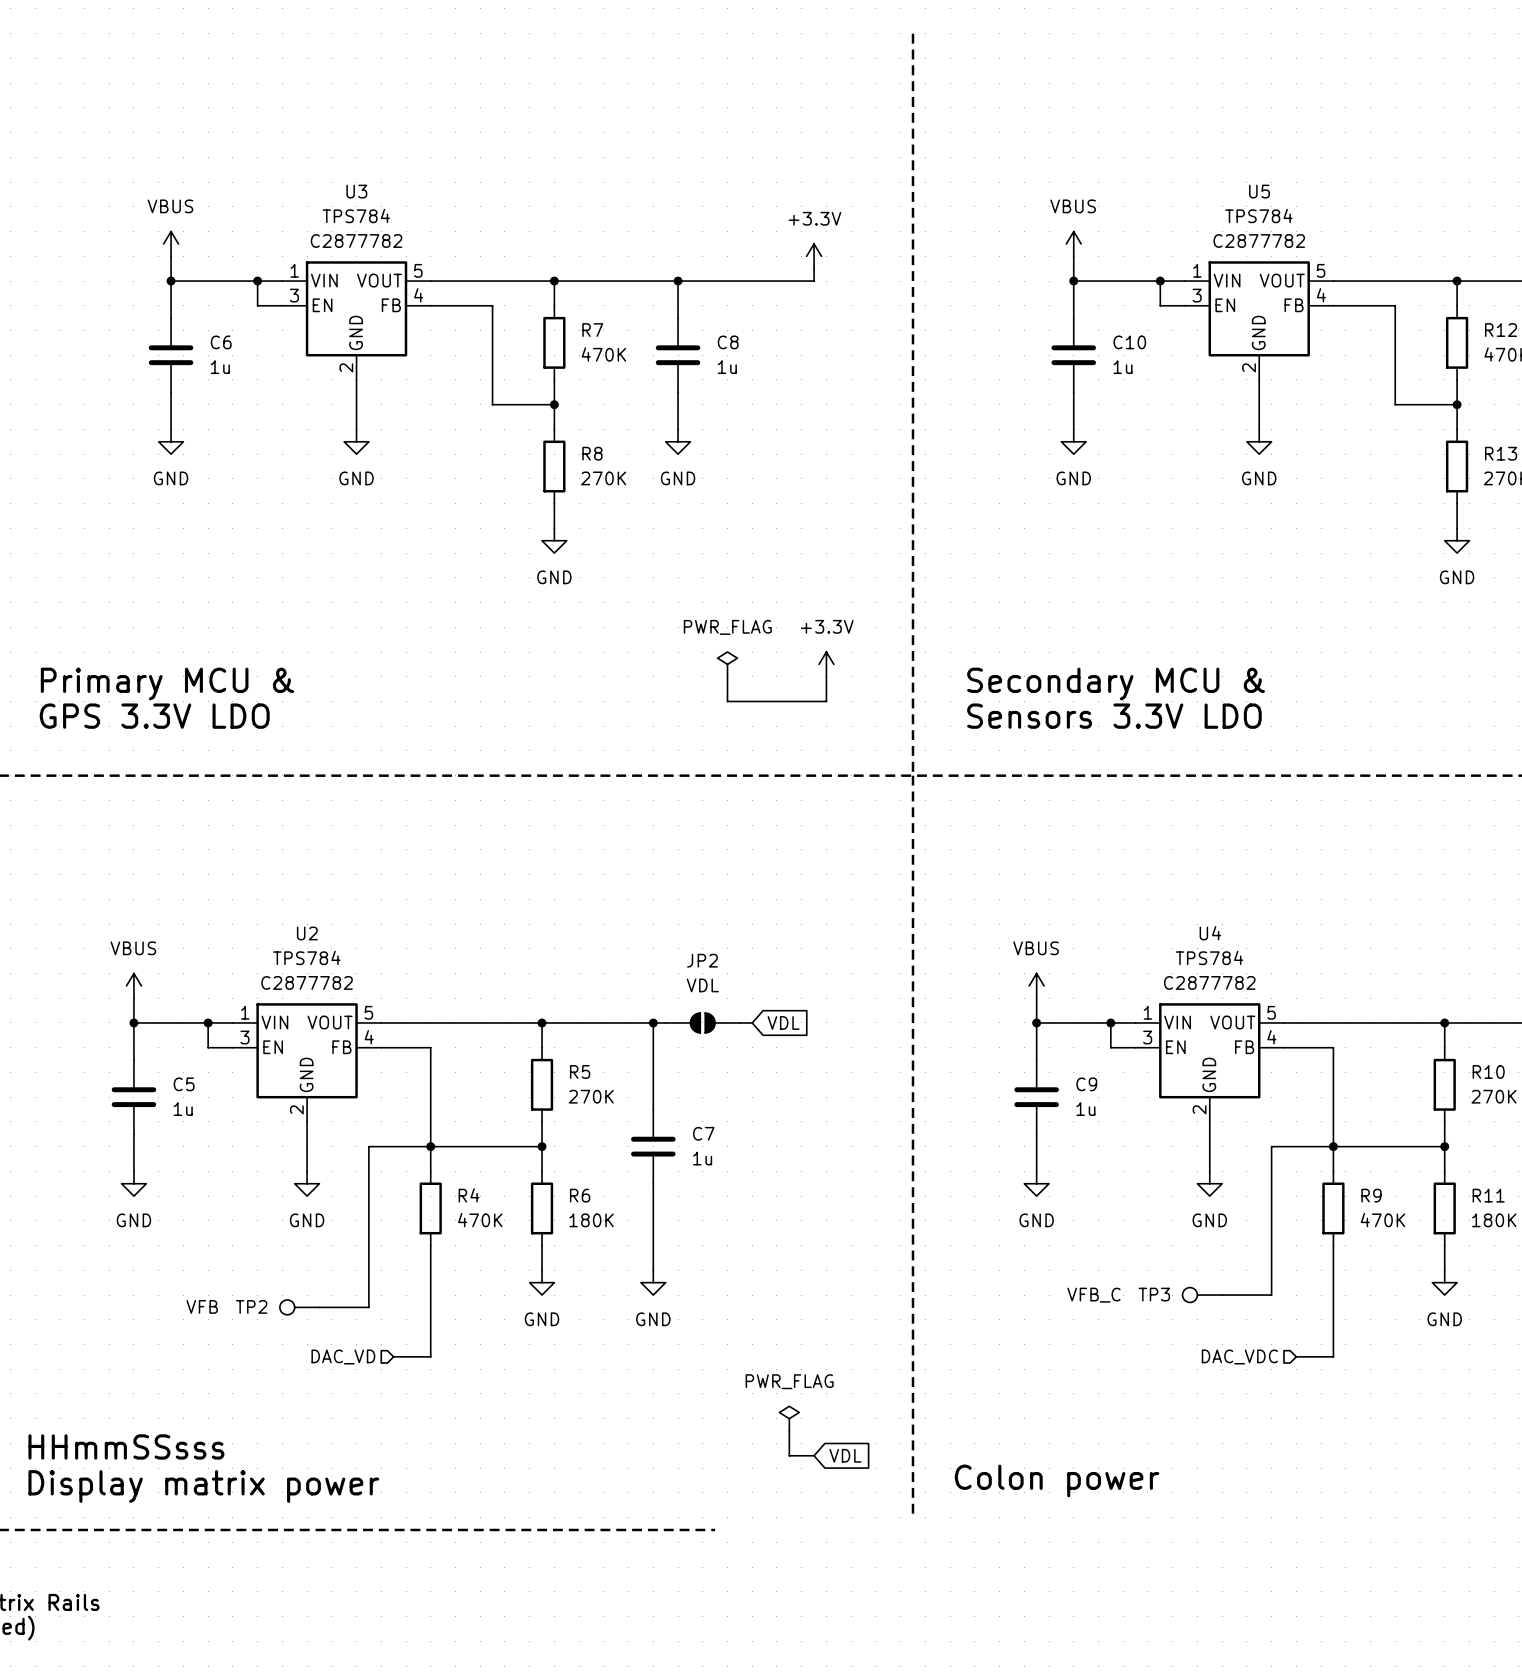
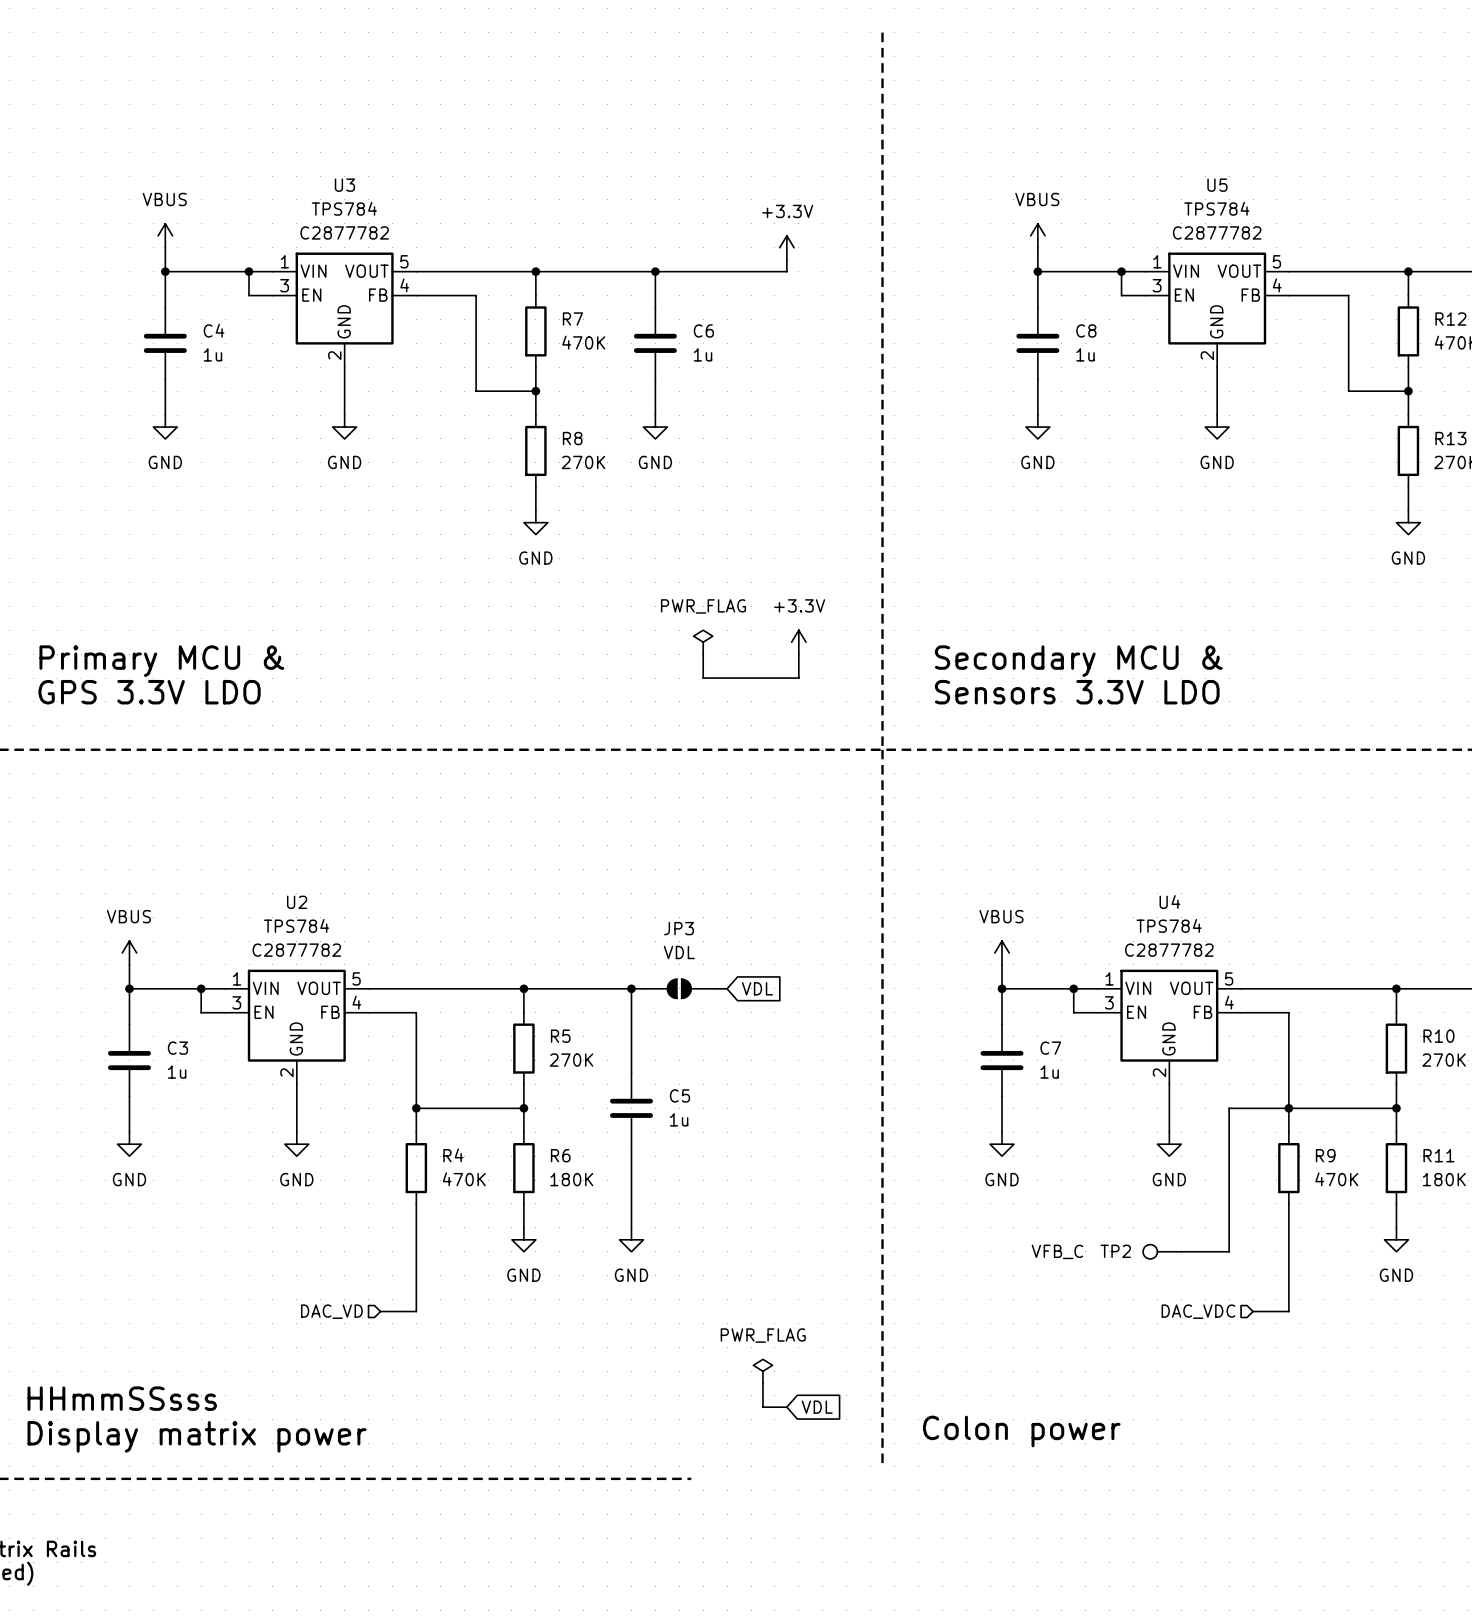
C6 name: C6 (221, 342) -> C4 (214, 330)
C8 name: C8 (728, 342) -> C6 (703, 330)
C10 name: C10 (1129, 342) -> C8 (1086, 330)
JP2 name: JP2 (702, 960) -> JP3 (679, 928)
C5 name: C5 (184, 1084) -> C3 (177, 1048)
C9 name: C9 (1086, 1084) -> C7 (1050, 1048)
C7 name: C7 (703, 1133) -> C5 (679, 1095)
wire: (430, 1146) (368, 1146) (368, 1307) (319, 1307) -> none
TP3 name: TP3 (1154, 1294) -> TP2 (1115, 1251)
TP2: VFB (299, 1307) -> none

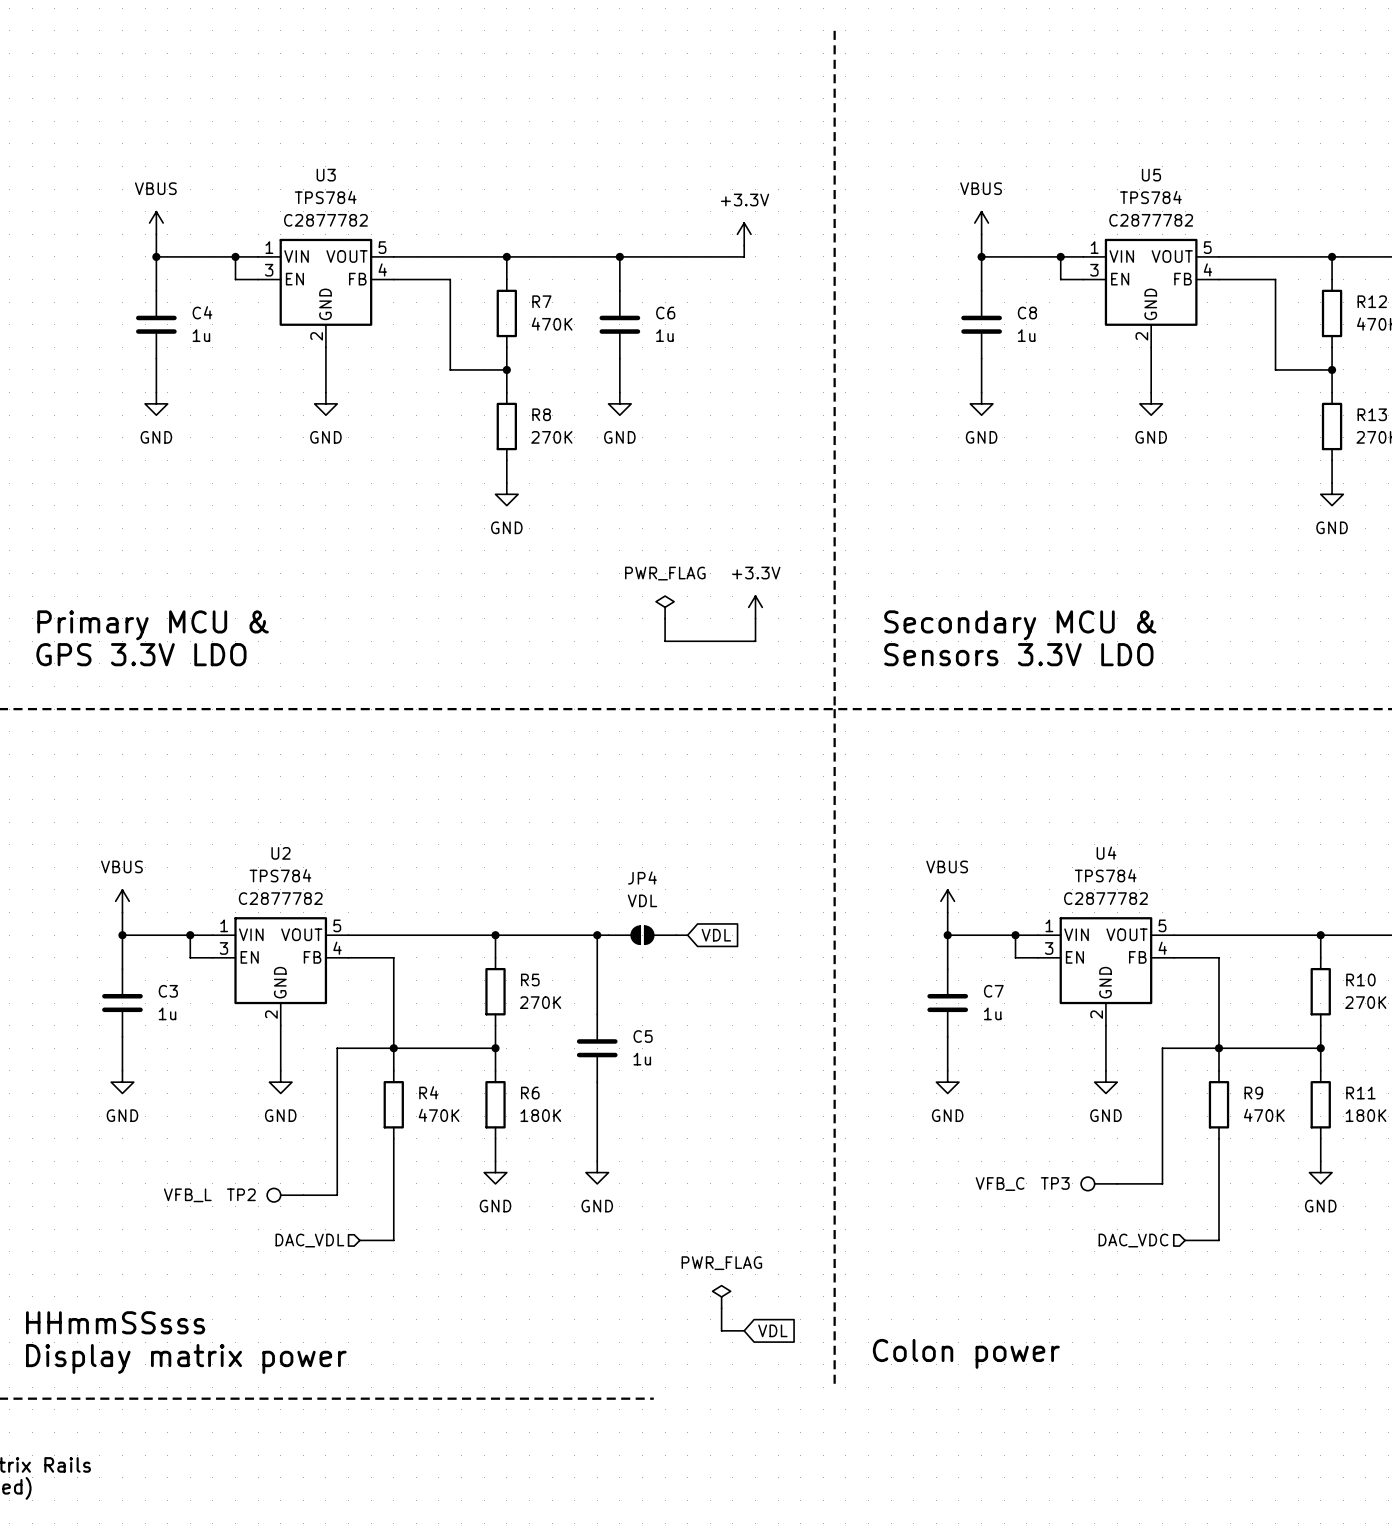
JP3 name: JP3 (679, 928) -> JP4 (642, 877)
wire: none -> (393, 1048) (337, 1048) (337, 1195) (303, 1195)
TP2 name: TP2 (1115, 1251) -> TP3 (1055, 1183)
TP2: none -> VFB_L (285, 1195)
hierarchical label: DAC_VD (331, 1311) -> DAC_VDL (309, 1240)

